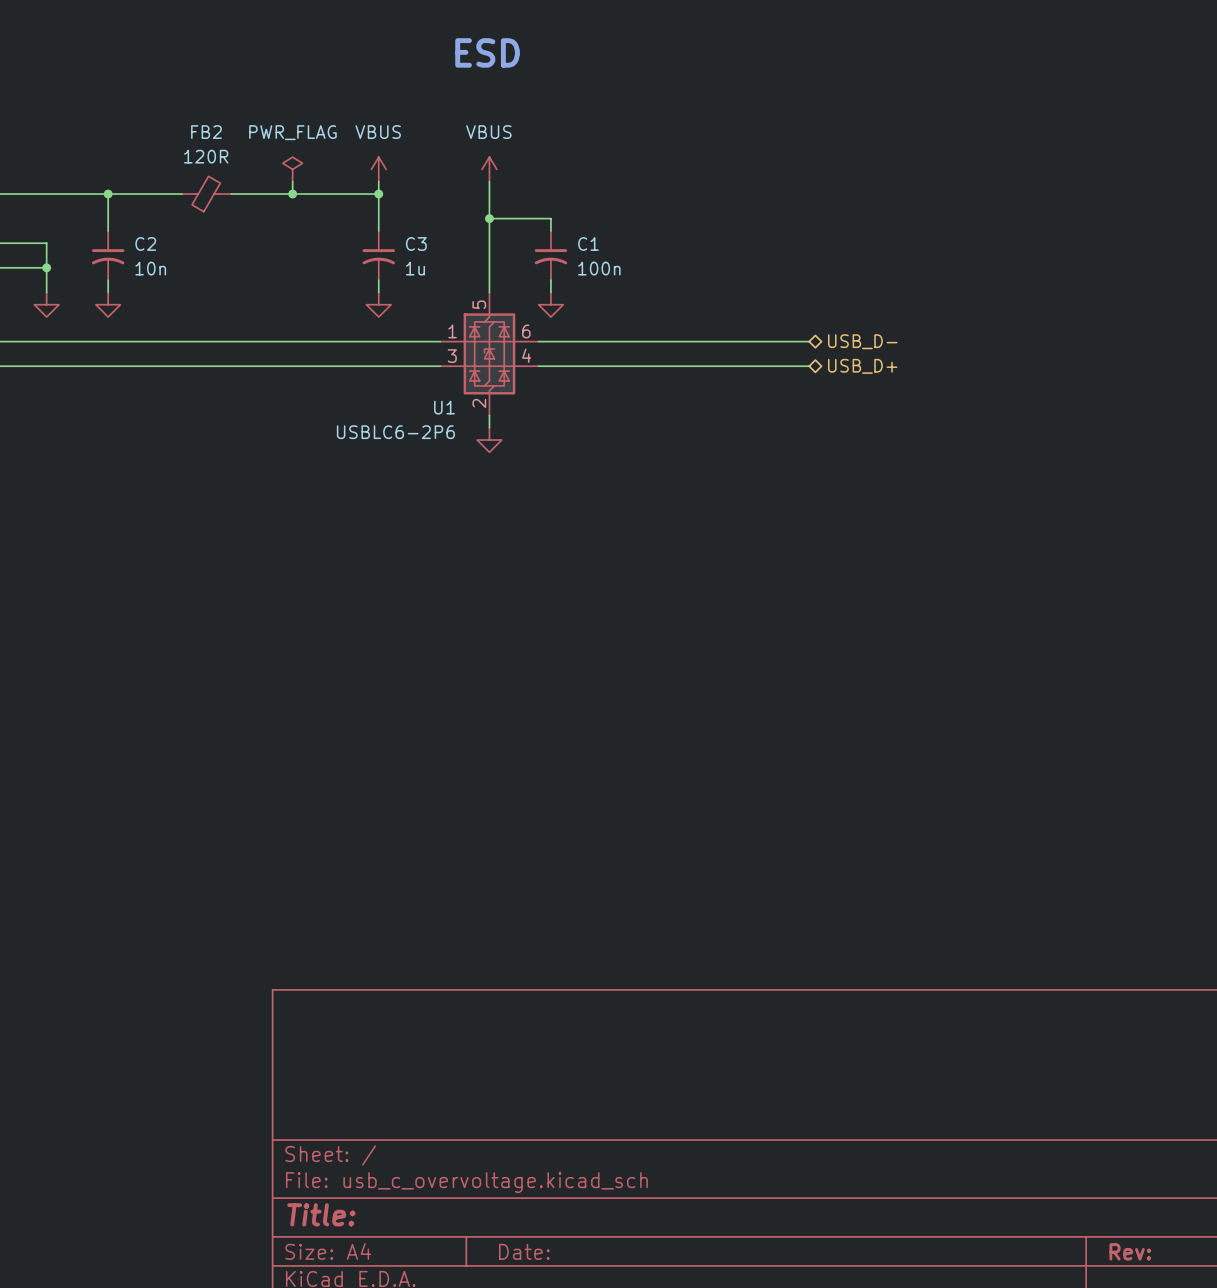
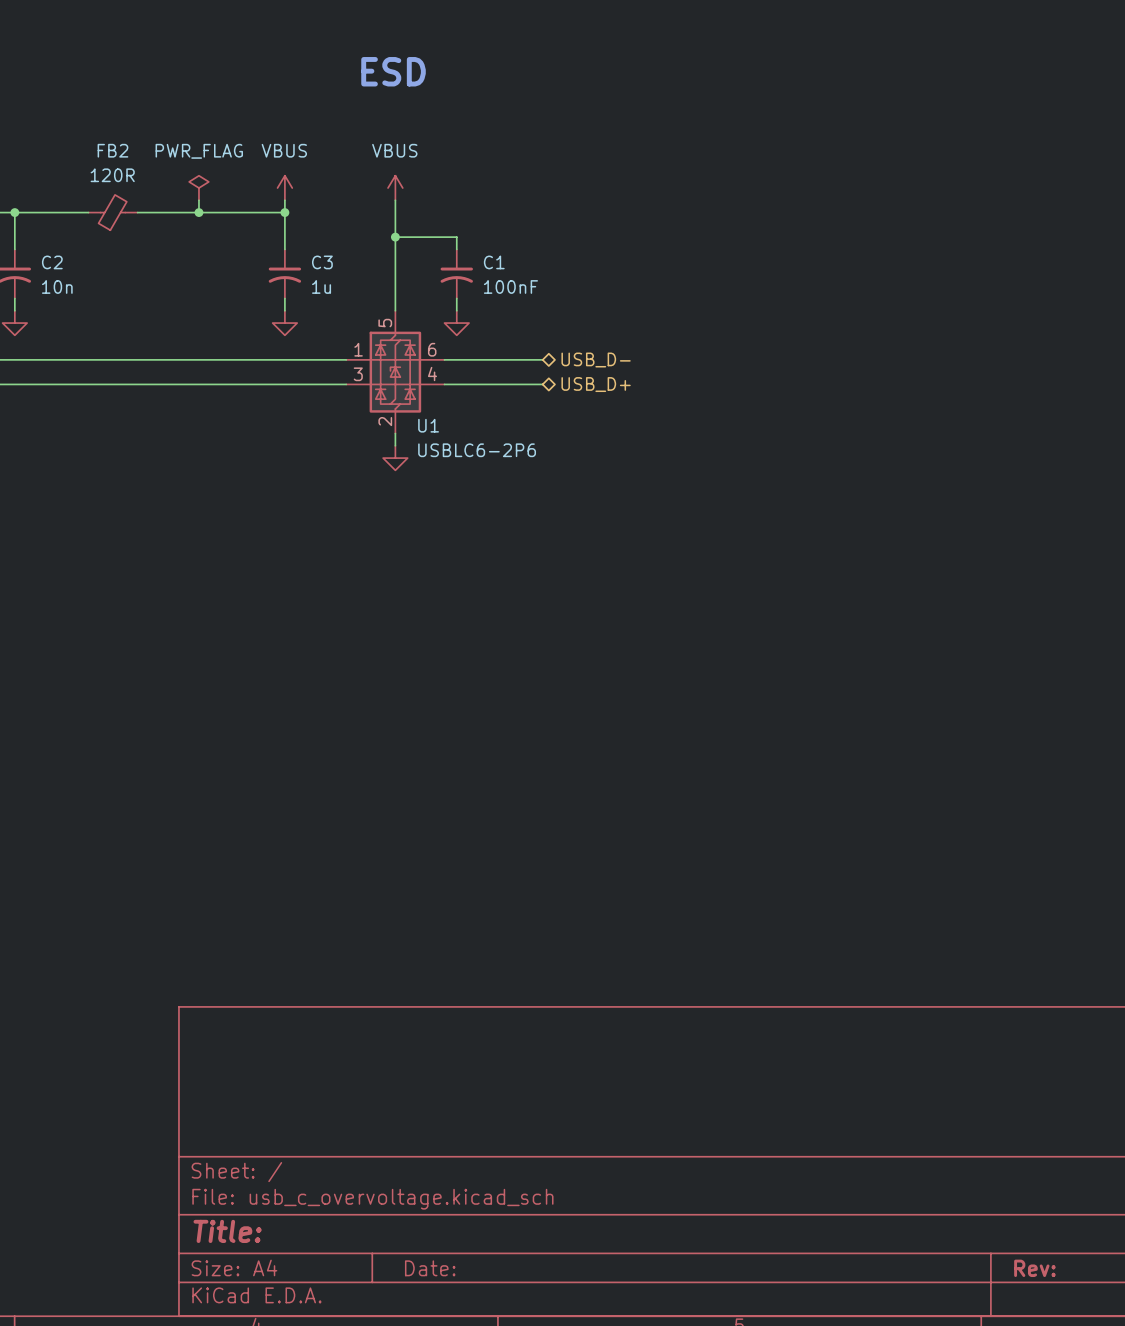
C1 value: 100n (599, 268) -> 100nF (510, 286)
wire: (637, 341) (809, 341) -> none
hierarchical label position: USB_D- (862, 341) -> USB_D- (596, 360)
wire: (637, 366) (809, 366) -> none
hierarchical label position: USB_D+ (862, 366) -> USB_D+ (596, 384)
U1 name position: U1 (444, 407) -> U1 (428, 425)
U1 value position: USBLC6-2P6 (395, 432) -> USBLC6-2P6 (477, 450)

